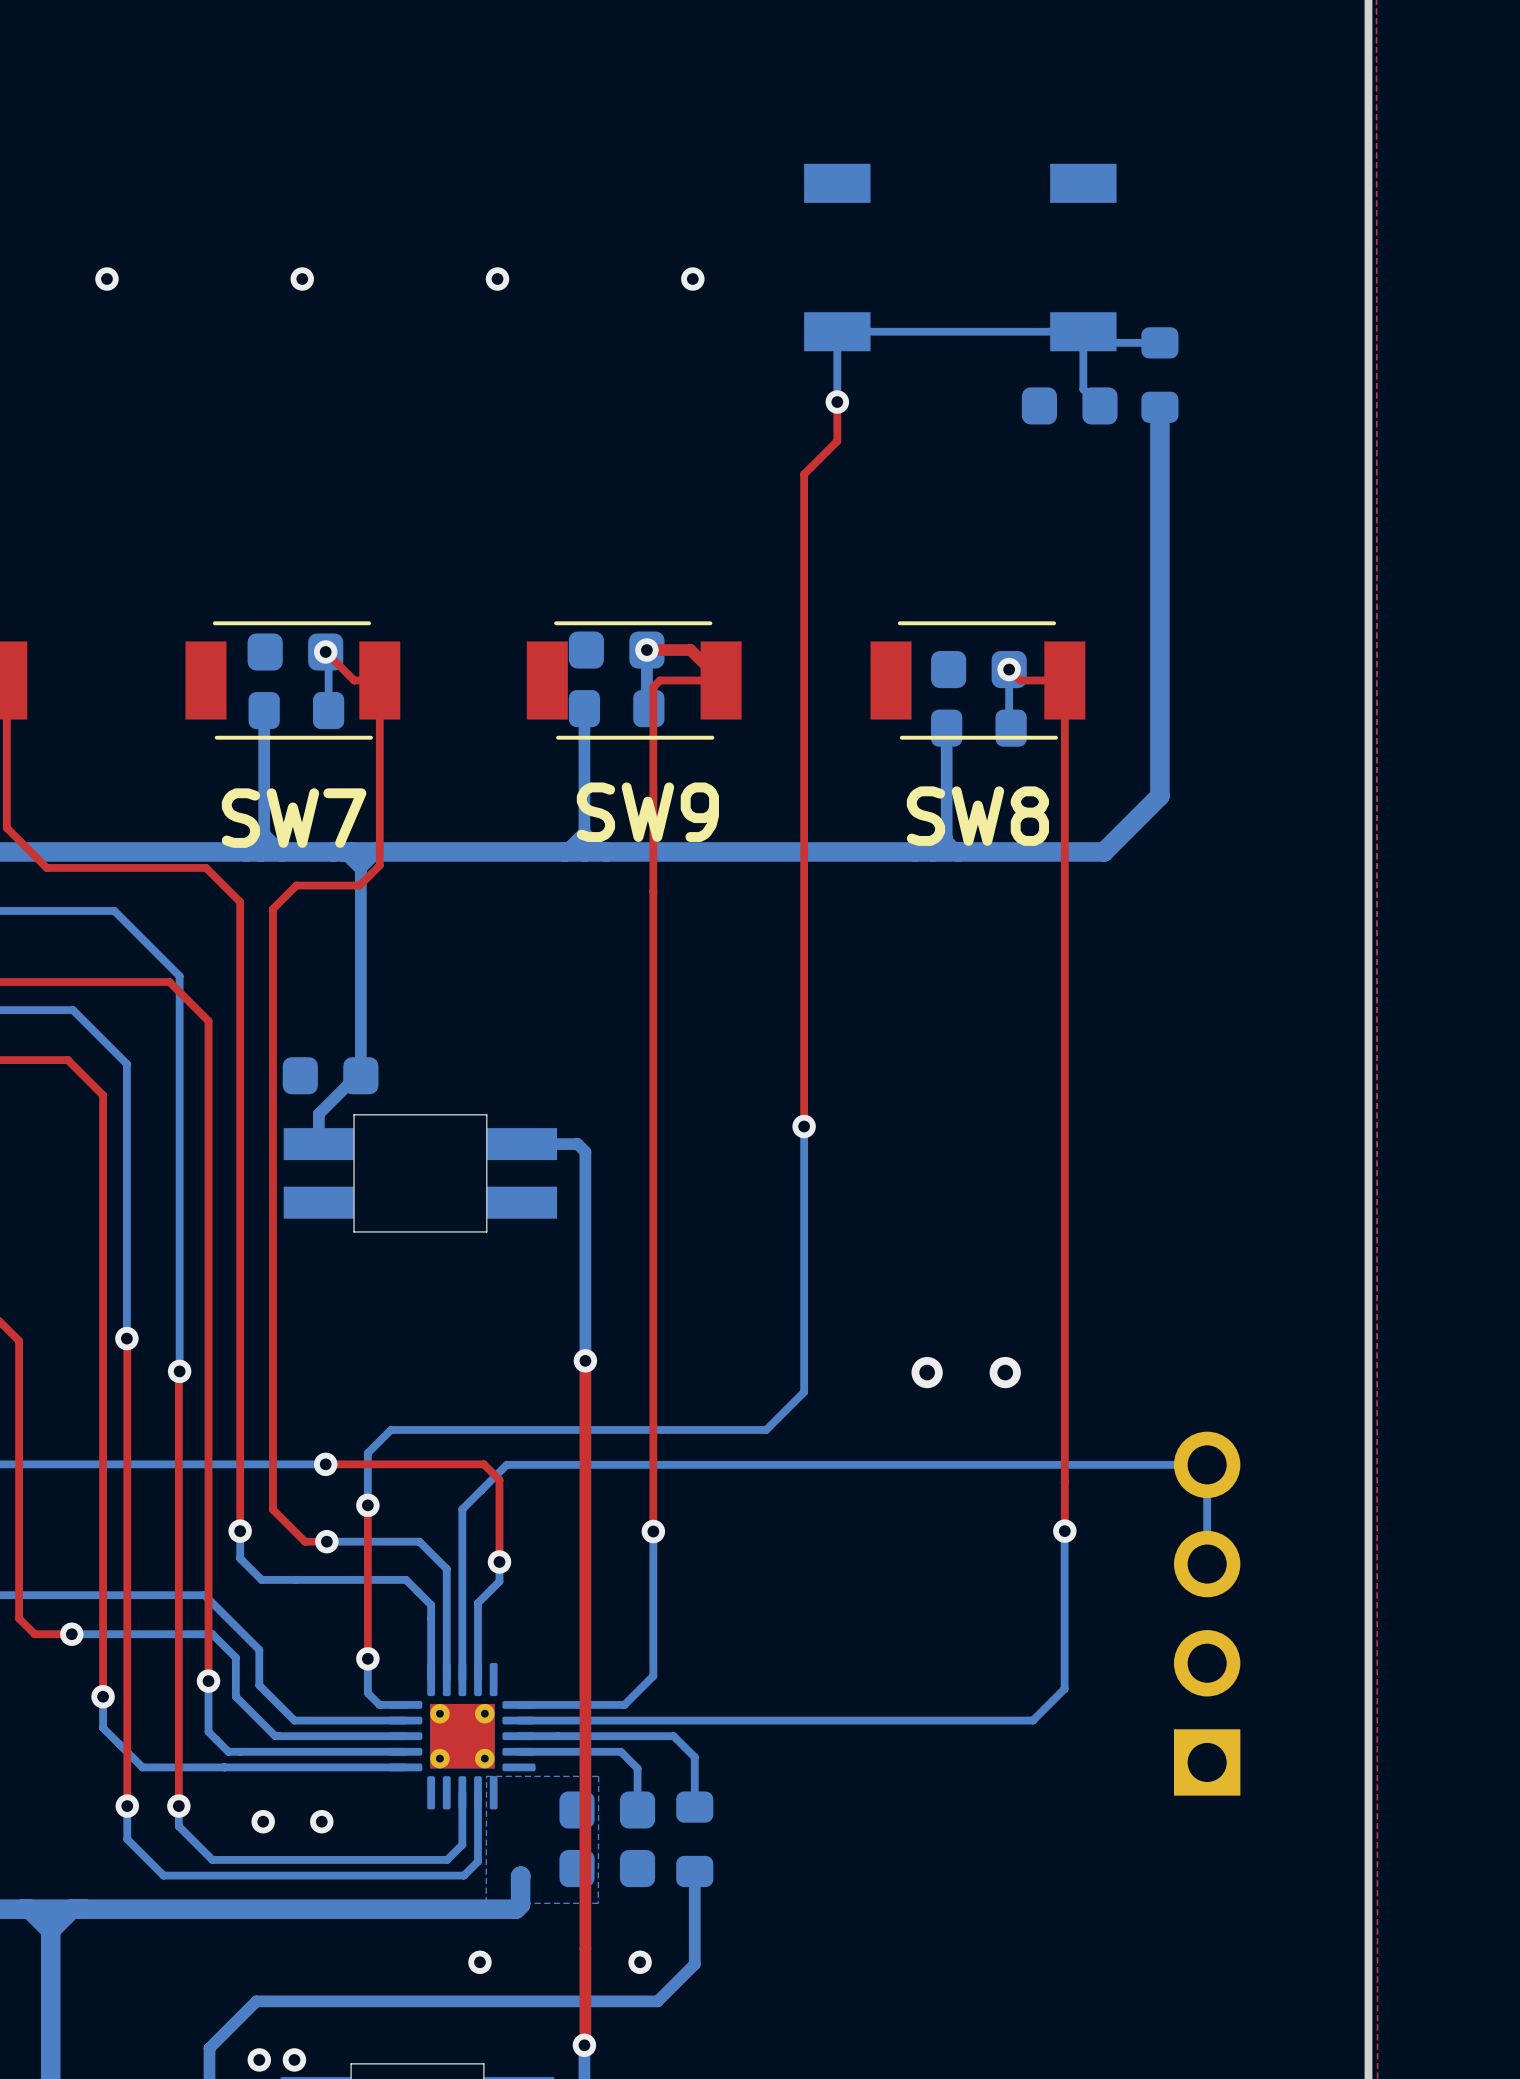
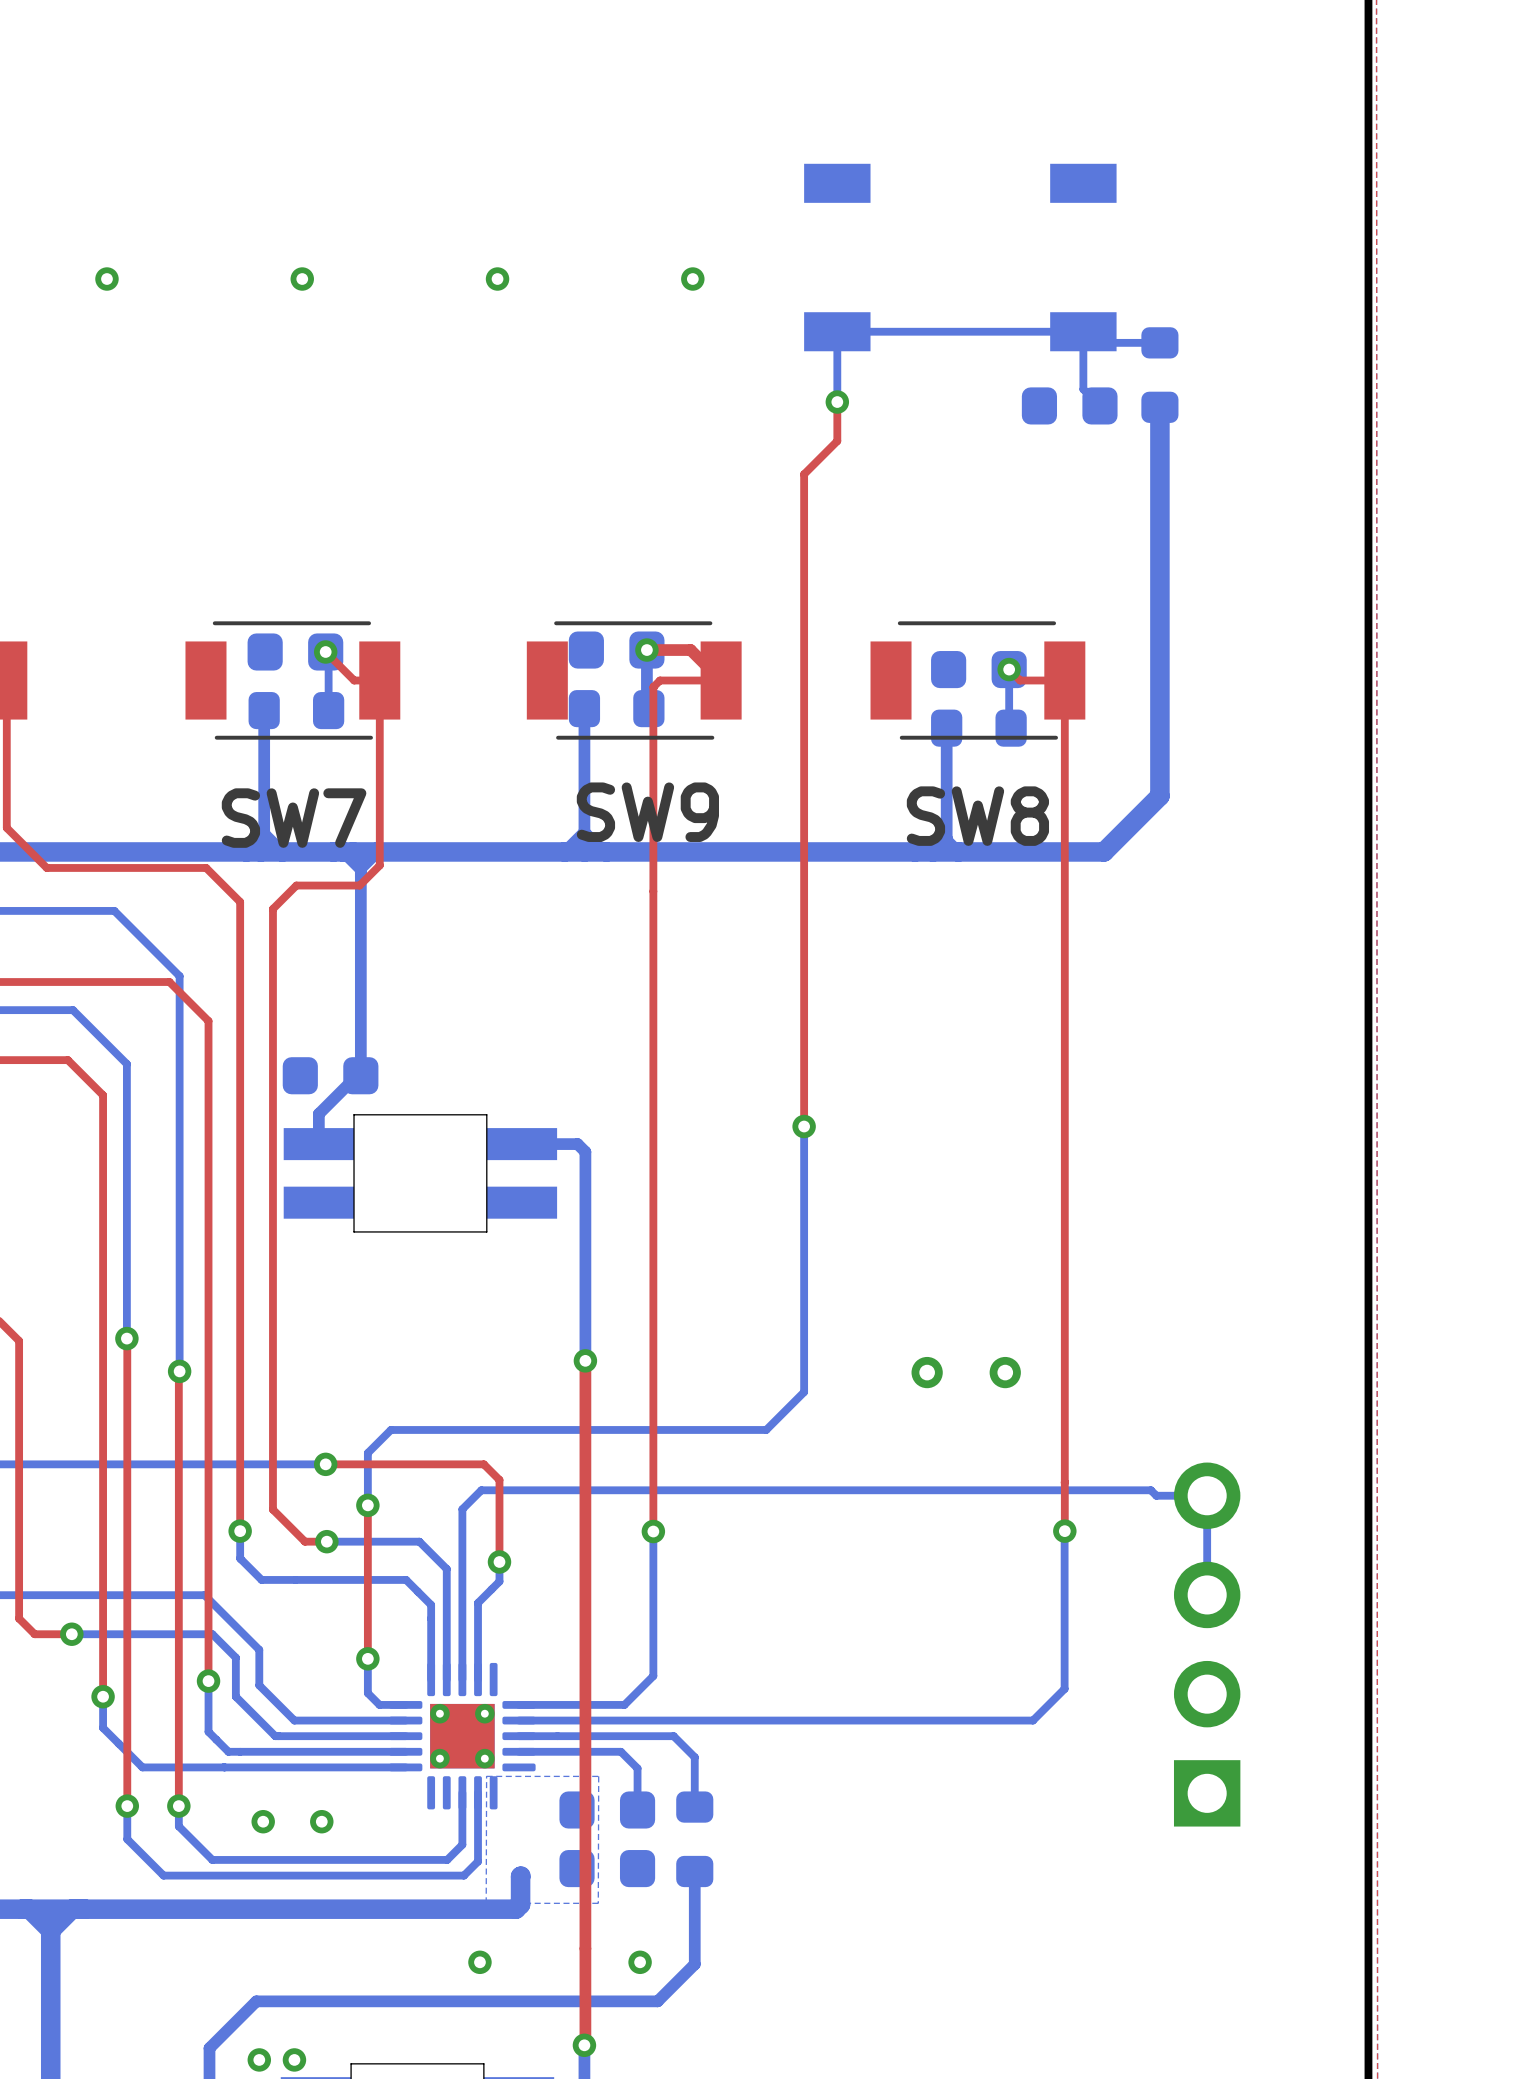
bottom track: (481, 1490) (506, 1464) (1207, 1464) (1207, 1495) -> (481, 1490) (1150, 1490) (1156, 1495) (1207, 1495)
part position: (1207, 1613) -> (1207, 1644)

